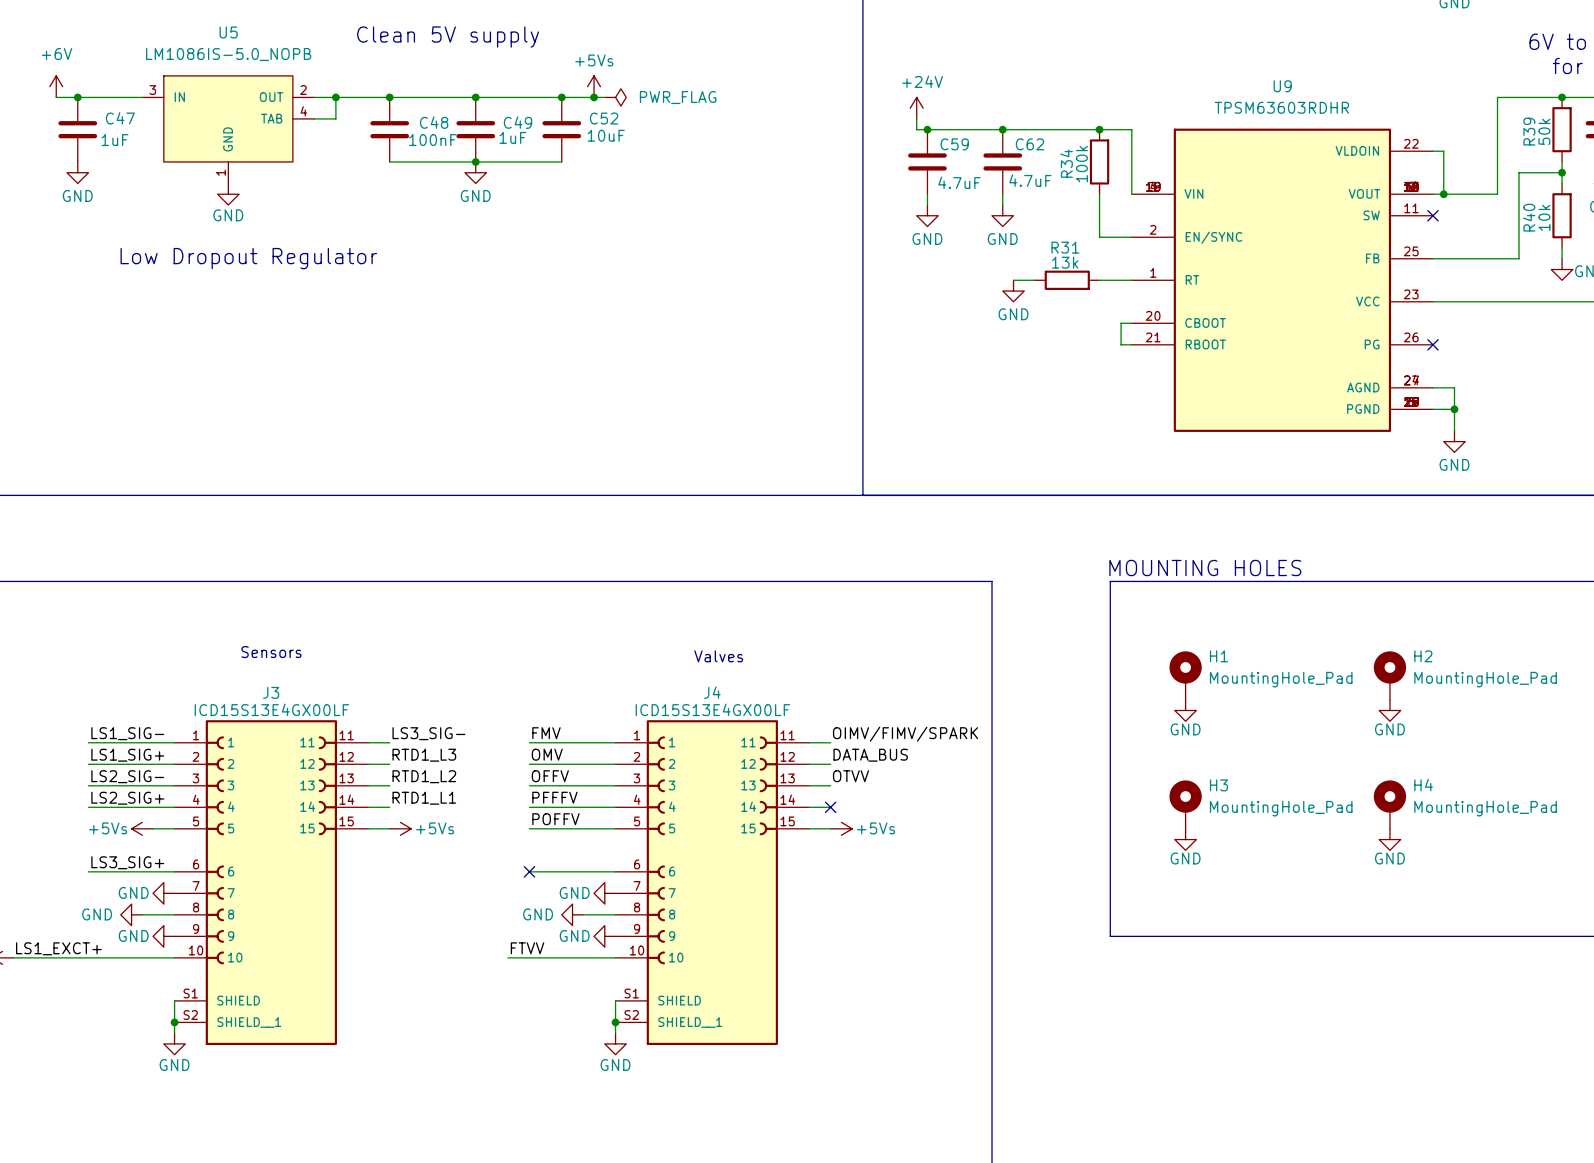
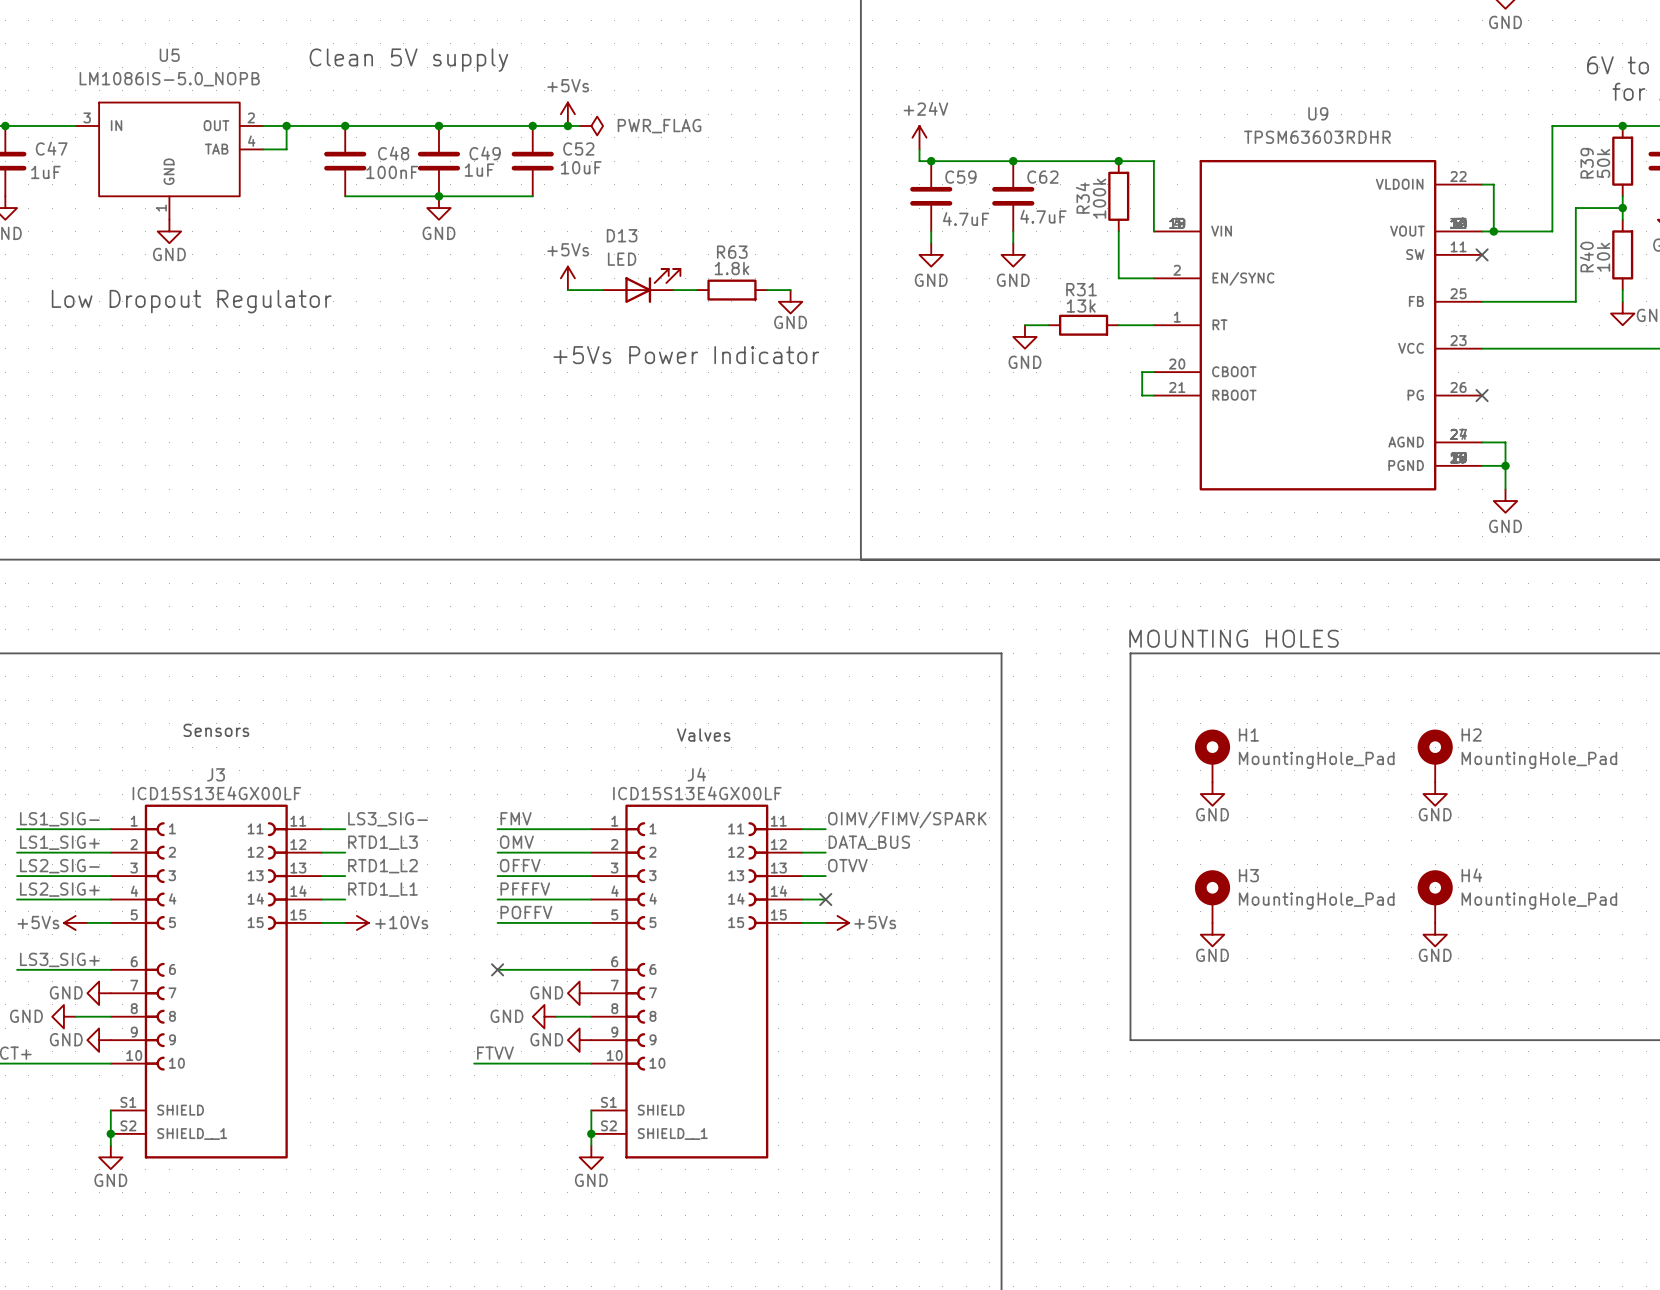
power symbol: none -> +5Vs (567, 278)
D13: none -> LED (641, 285)
wire: none -> (567, 290) (603, 290)
wire: none -> (673, 290) (696, 290)
R63: none -> 1.8k (731, 290)
wire: none -> (767, 290) (790, 290)
power symbol: none -> GND (790, 301)
text: none -> +5Vs Power Indicator (686, 355)
power symbol: +5Vs (400, 828) -> +10Vs (356, 922)

